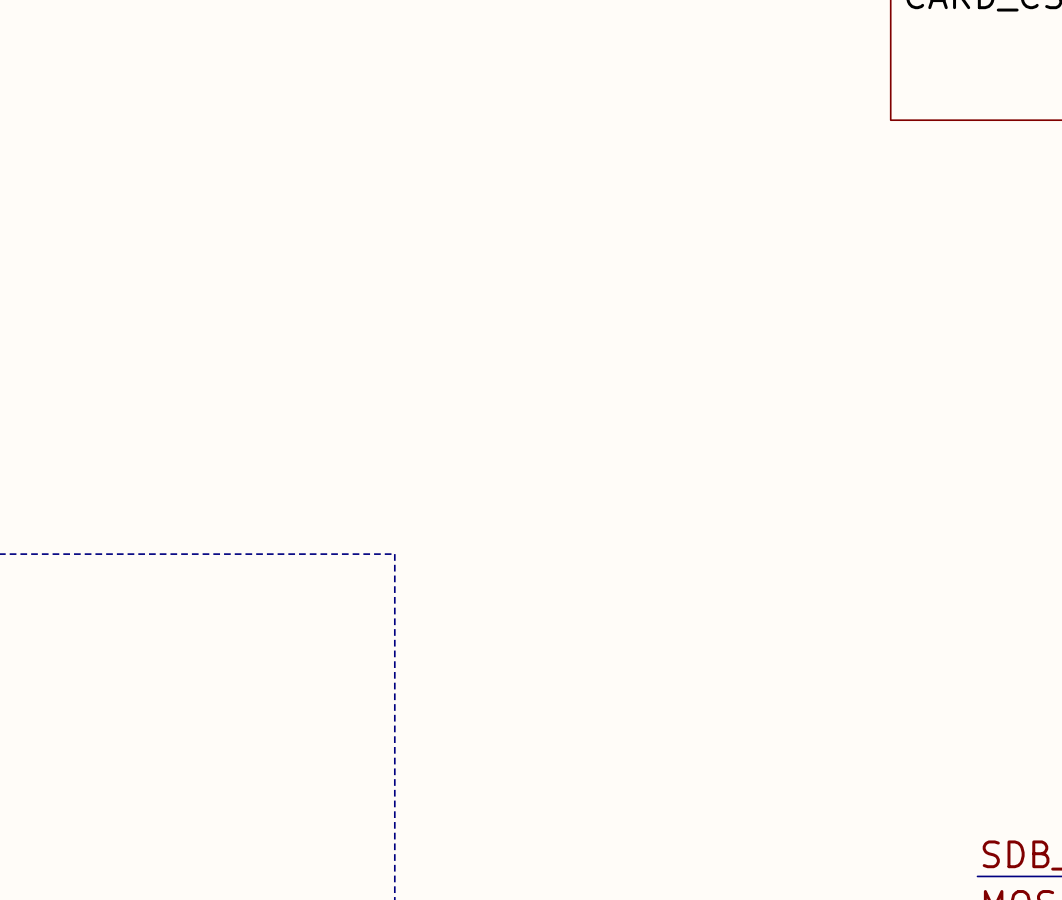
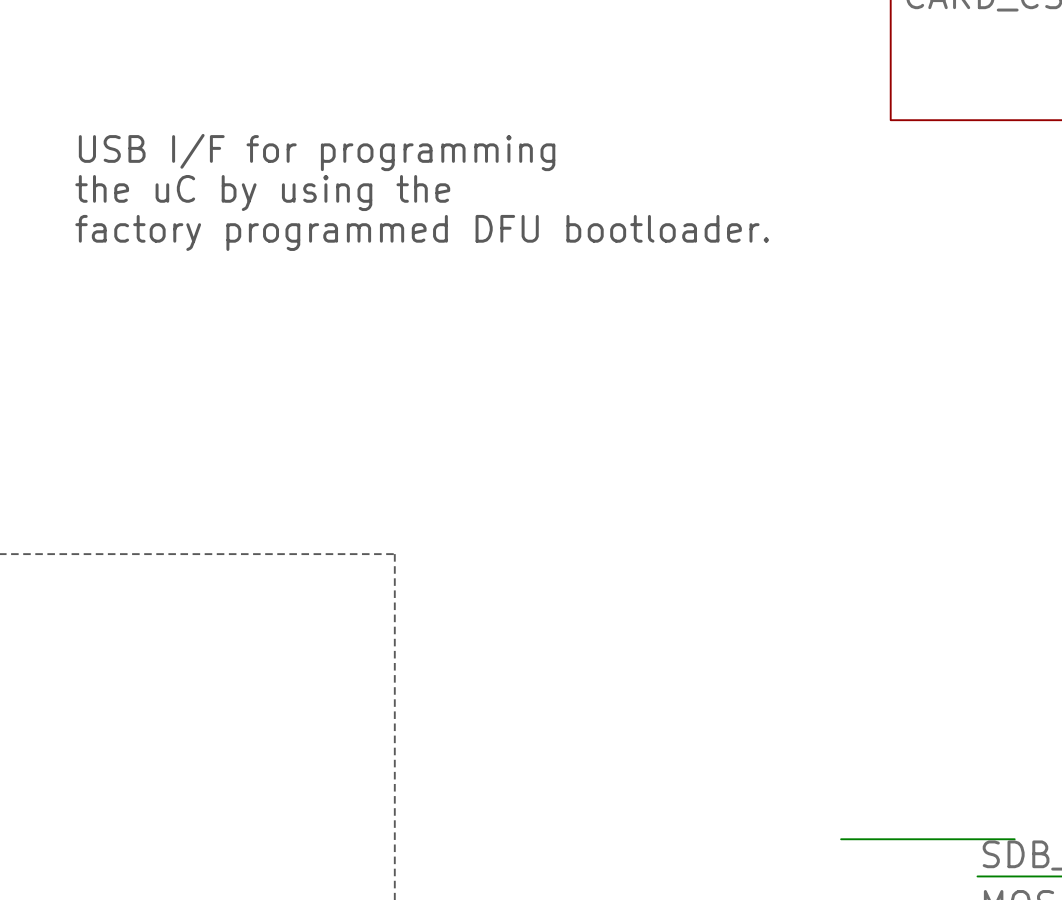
text: none -> USB I/F for programming (317, 152)
text: none -> the uC by using the (262, 193)
text: none -> factory programmed DFU bootloader. (422, 232)
wire: none -> (841, 839) (1014, 839)

